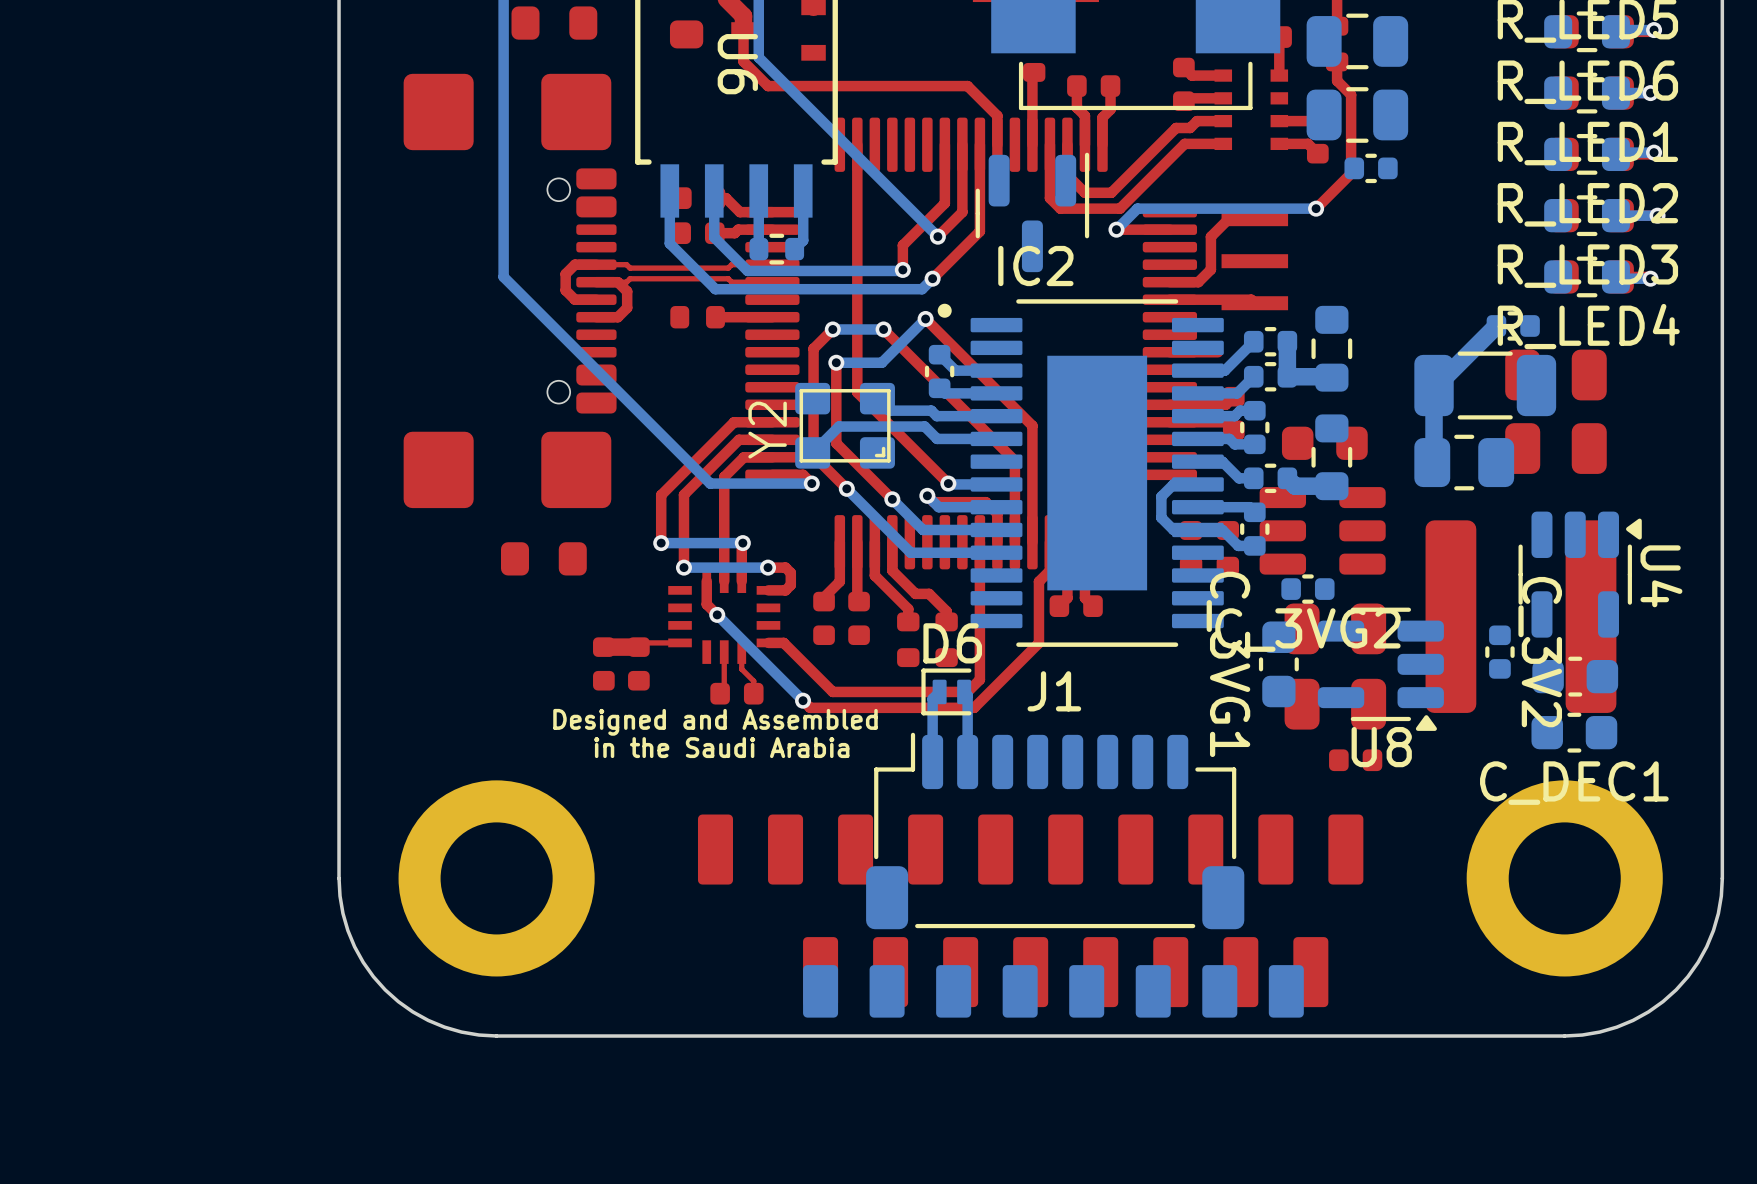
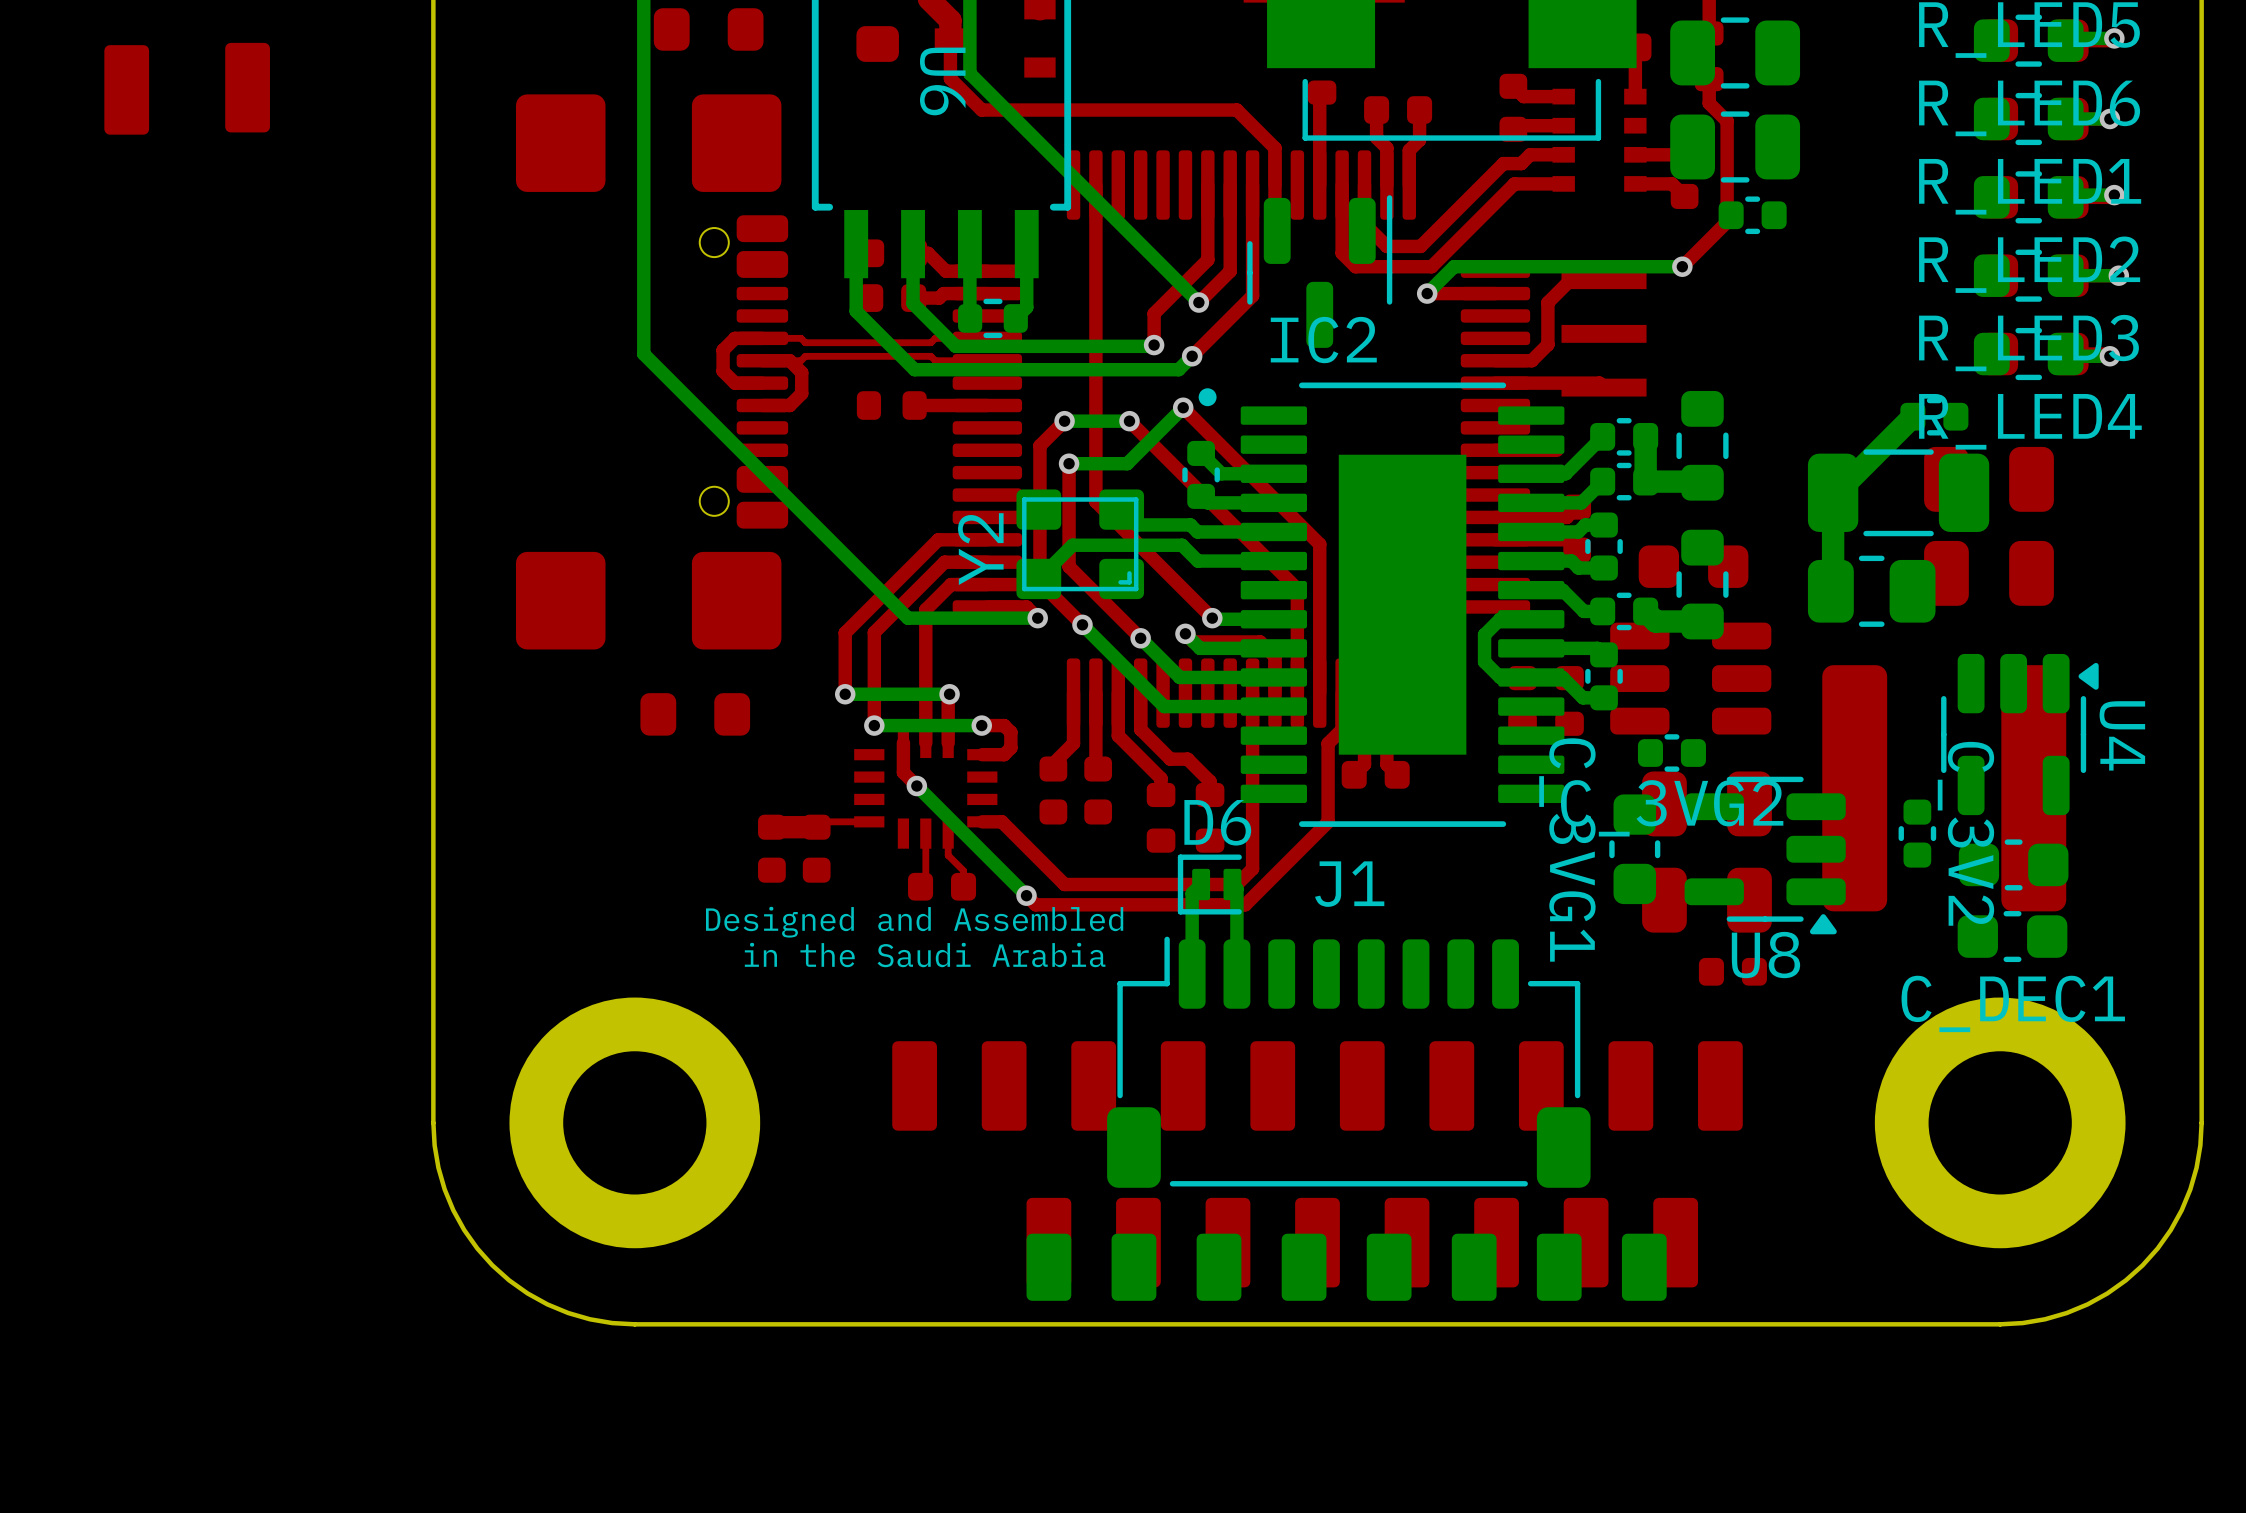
part: none -> (247, 87)
part: none -> (126, 89)

